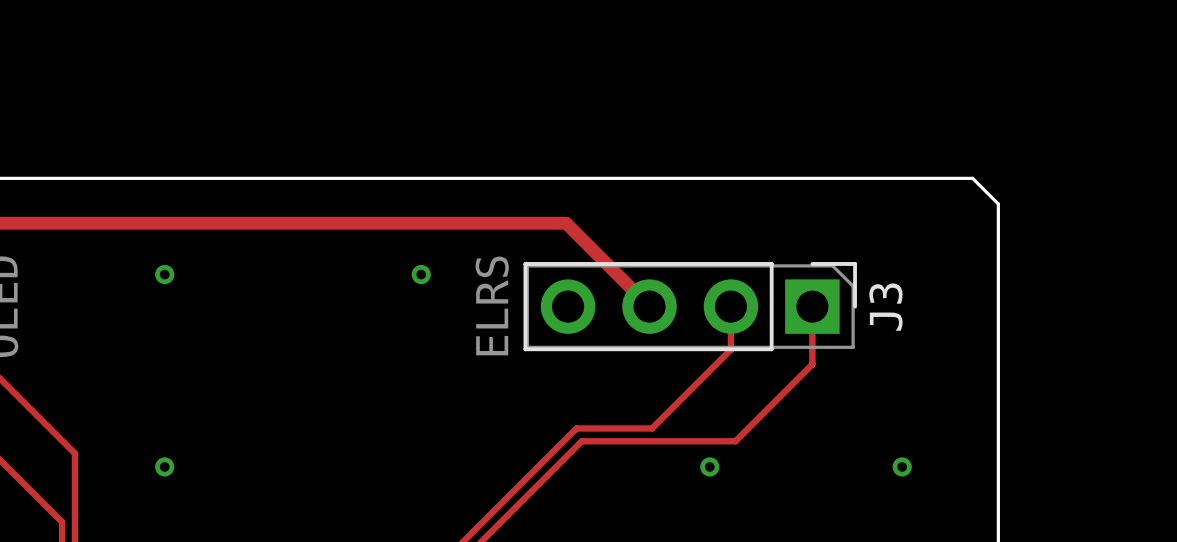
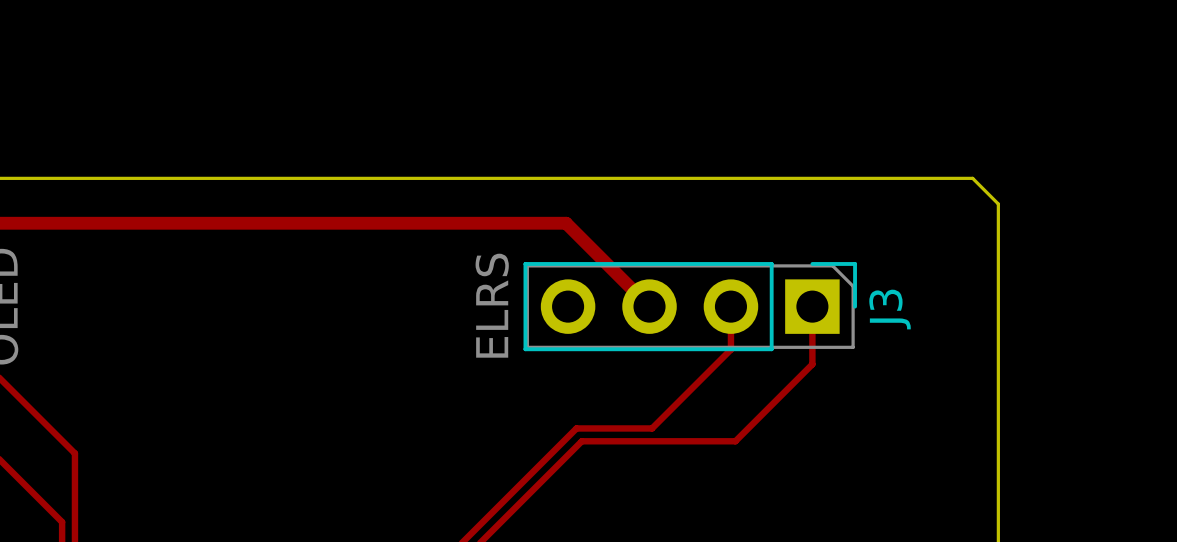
via: (164, 274) -> none
via: (421, 274) -> none
via: (164, 466) -> none
via: (709, 466) -> none
via: (902, 466) -> none

